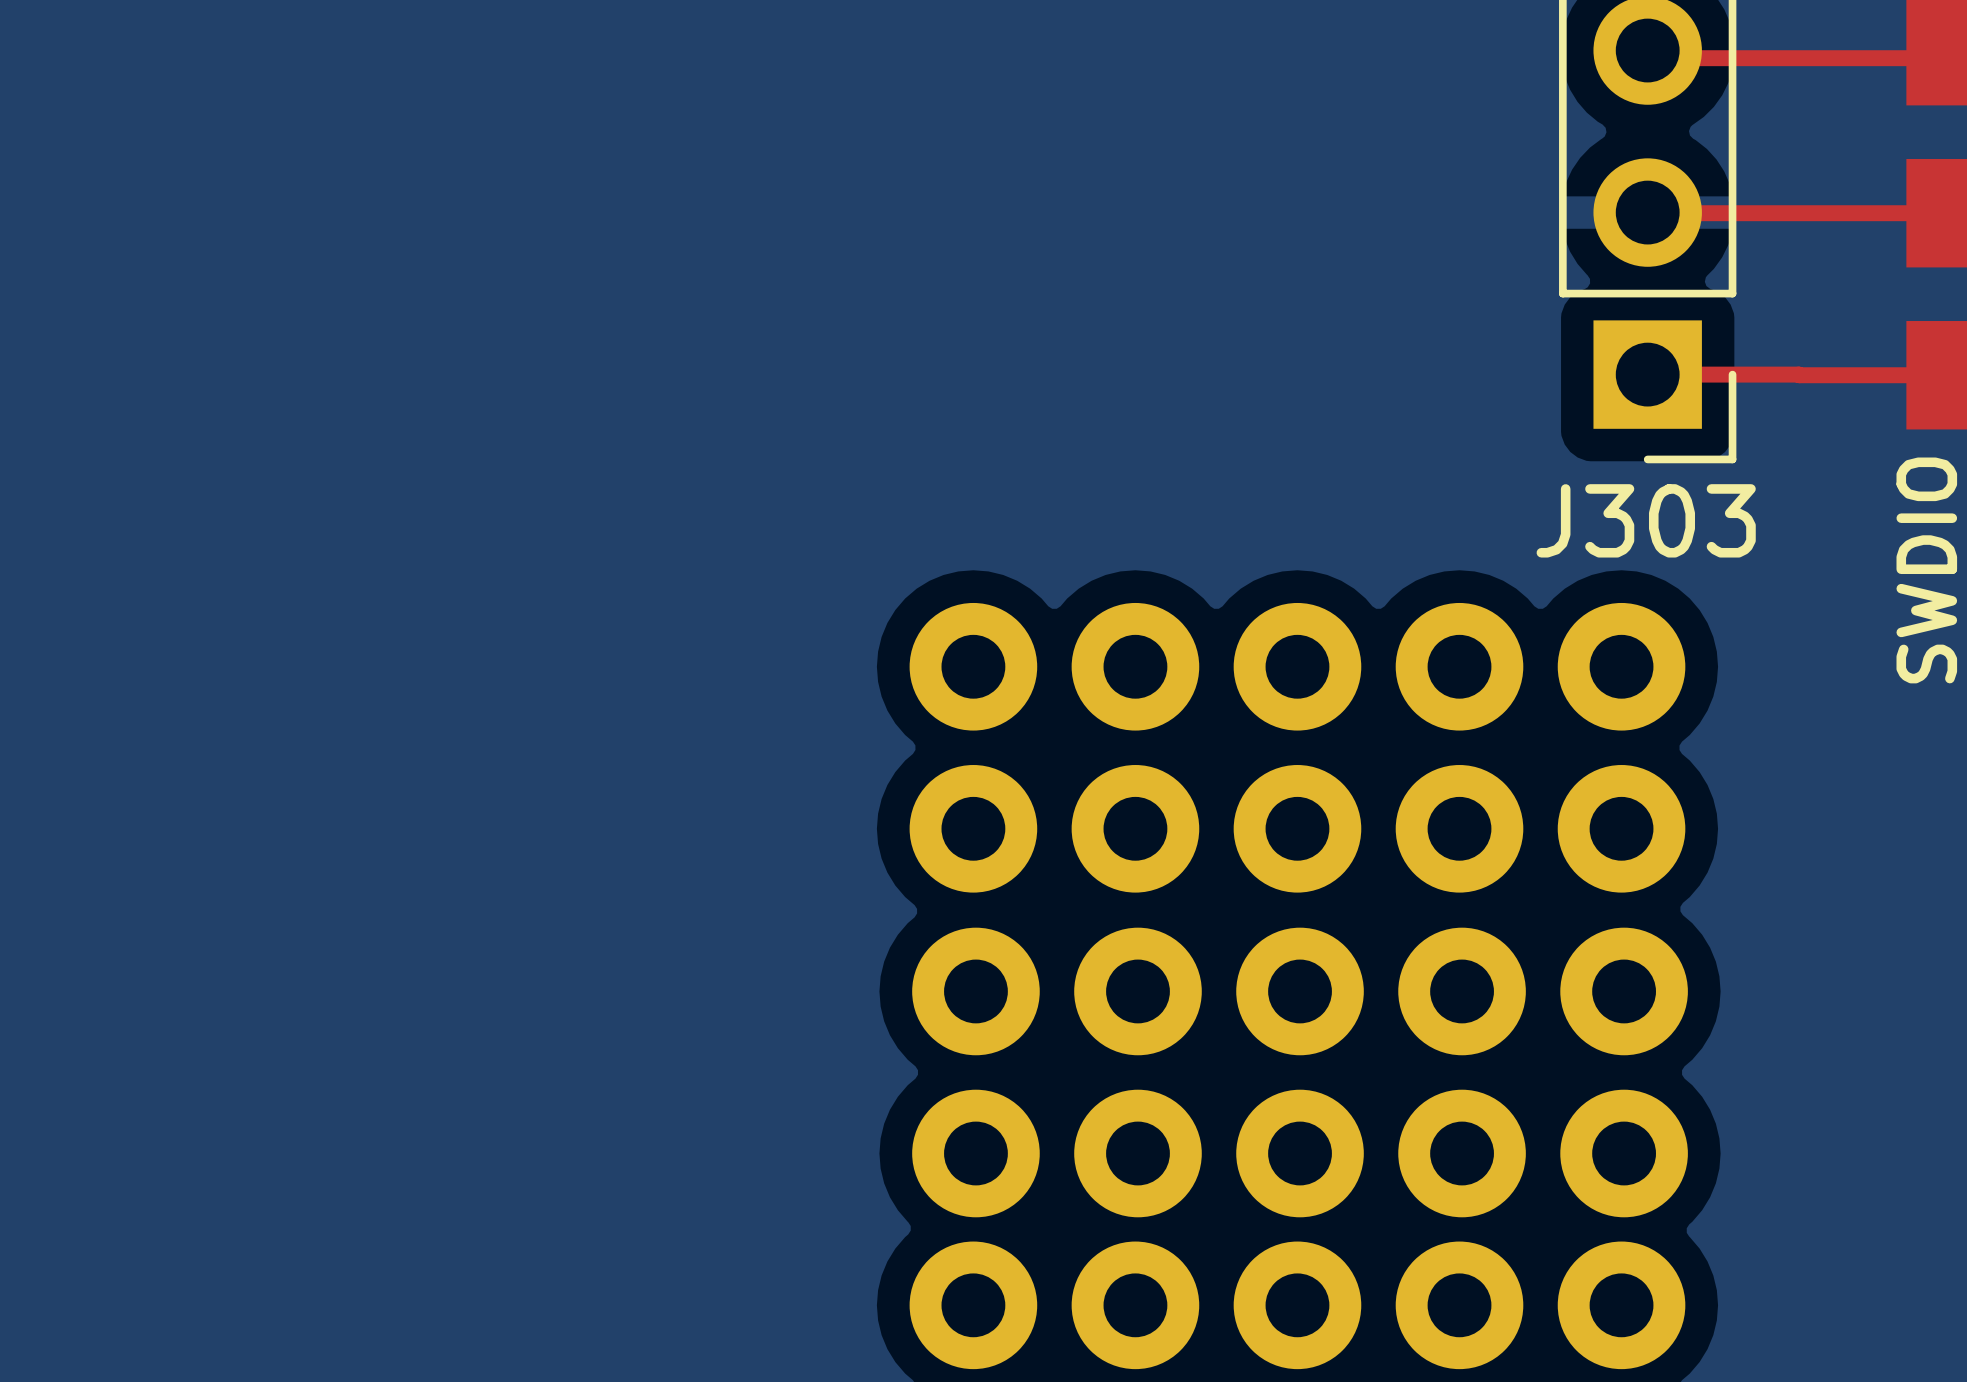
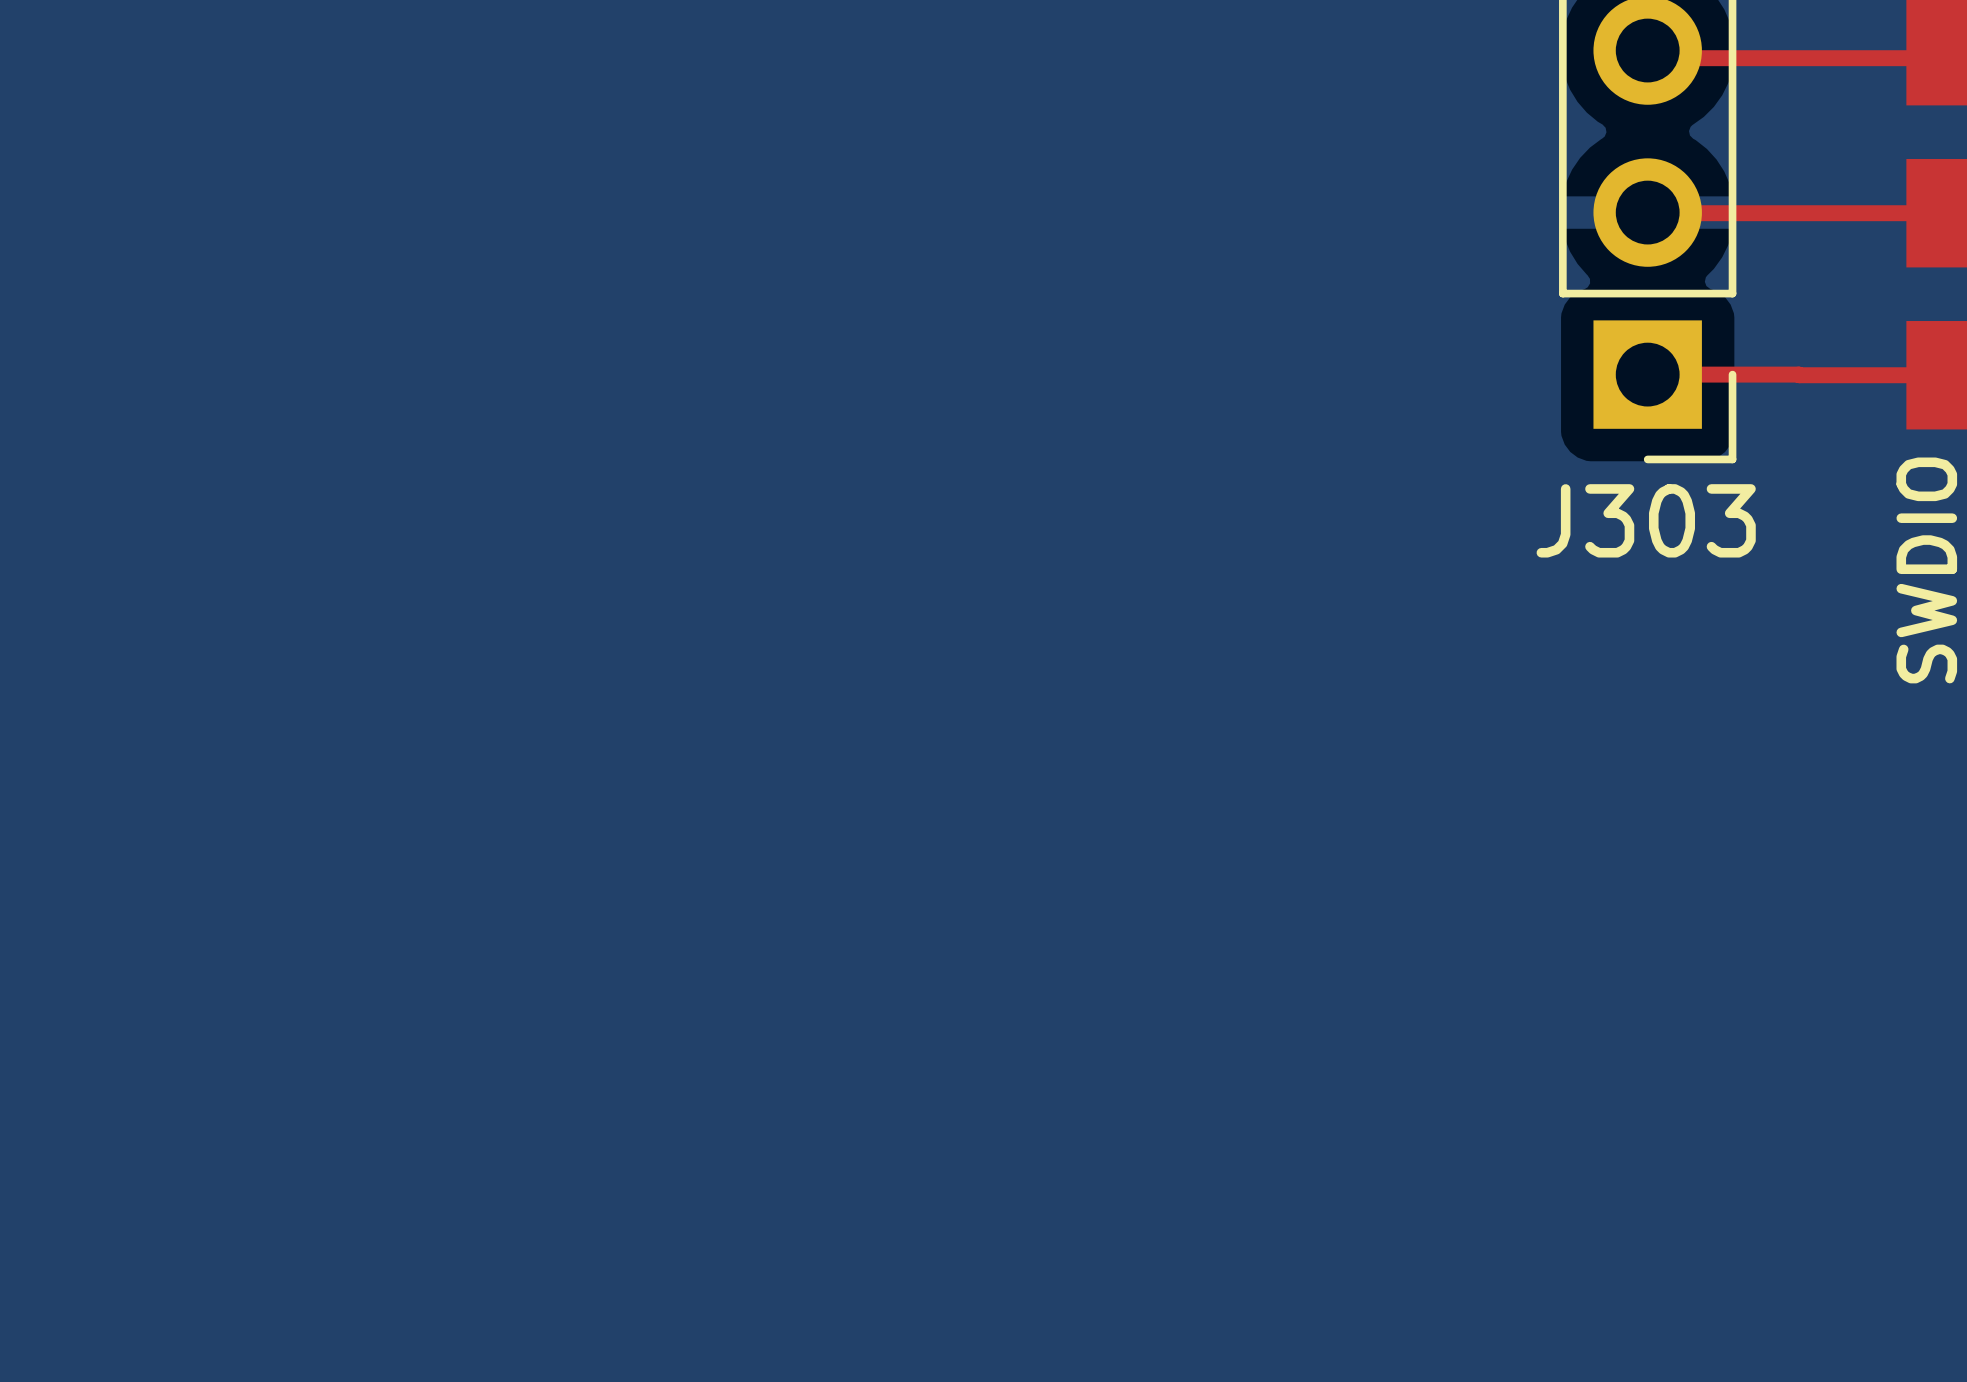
part: (973, 666) -> none
part: (1135, 666) -> none
part: (1297, 666) -> none
part: (1459, 666) -> none
part: (1621, 666) -> none
part: (973, 828) -> none
part: (1135, 828) -> none
part: (1297, 828) -> none
part: (1459, 828) -> none
part: (1621, 828) -> none
part: (975, 991) -> none
part: (1137, 991) -> none
part: (1300, 991) -> none
part: (1462, 991) -> none
part: (1624, 991) -> none
part: (975, 1153) -> none
part: (1137, 1153) -> none
part: (1300, 1153) -> none
part: (1462, 1153) -> none
part: (1624, 1153) -> none
part: (973, 1305) -> none
part: (1135, 1305) -> none
part: (1297, 1305) -> none
part: (1459, 1305) -> none
part: (1621, 1305) -> none

